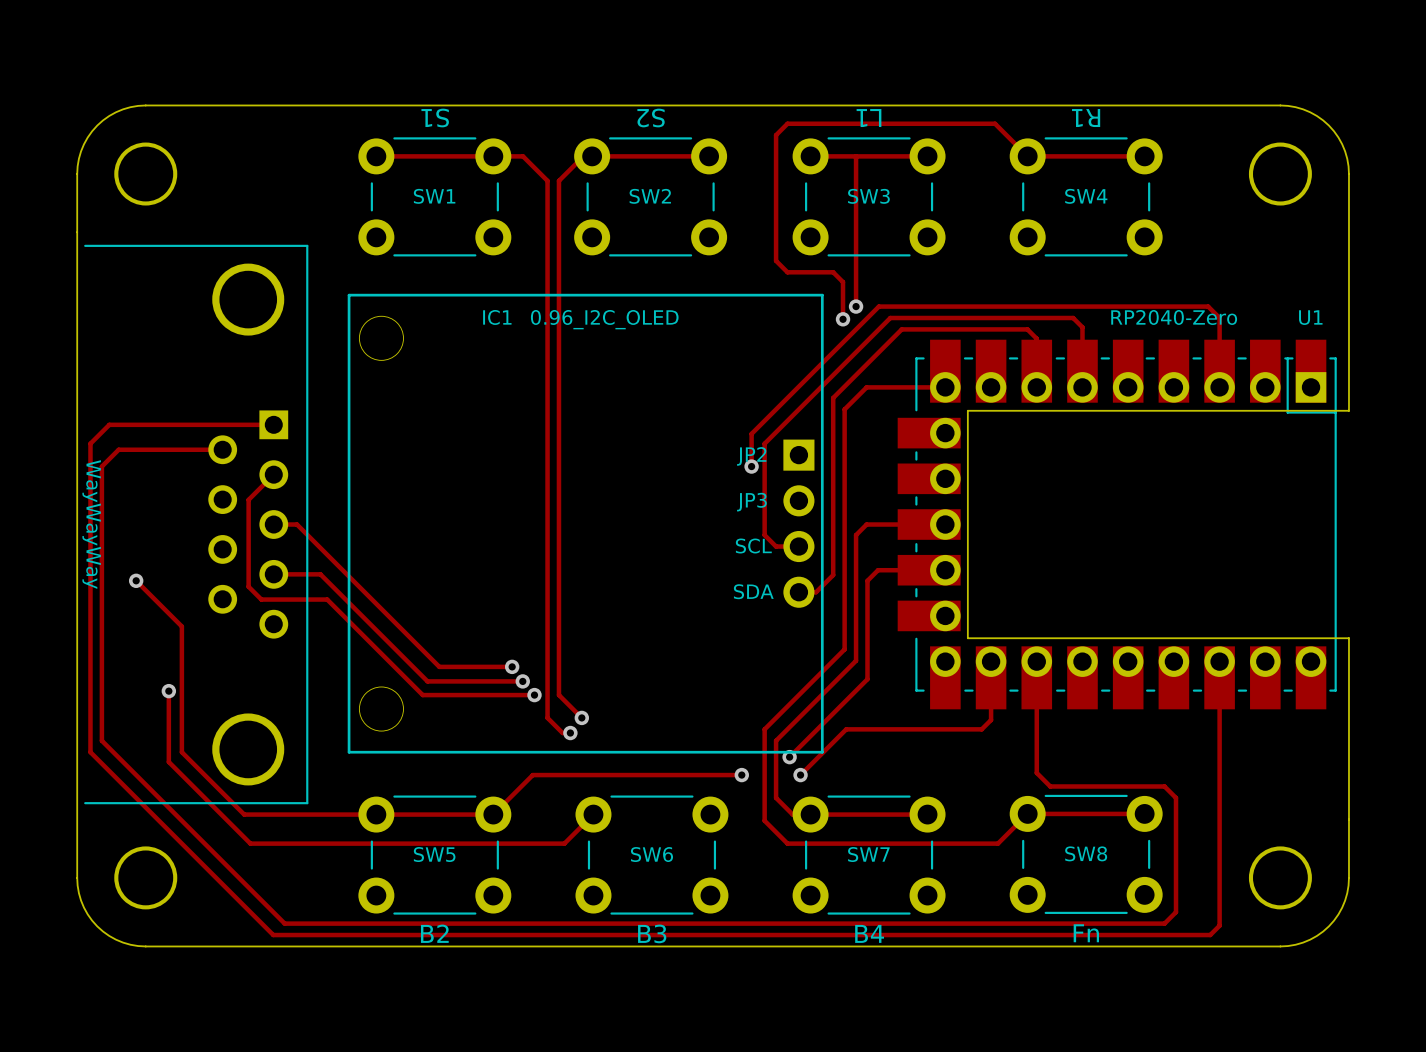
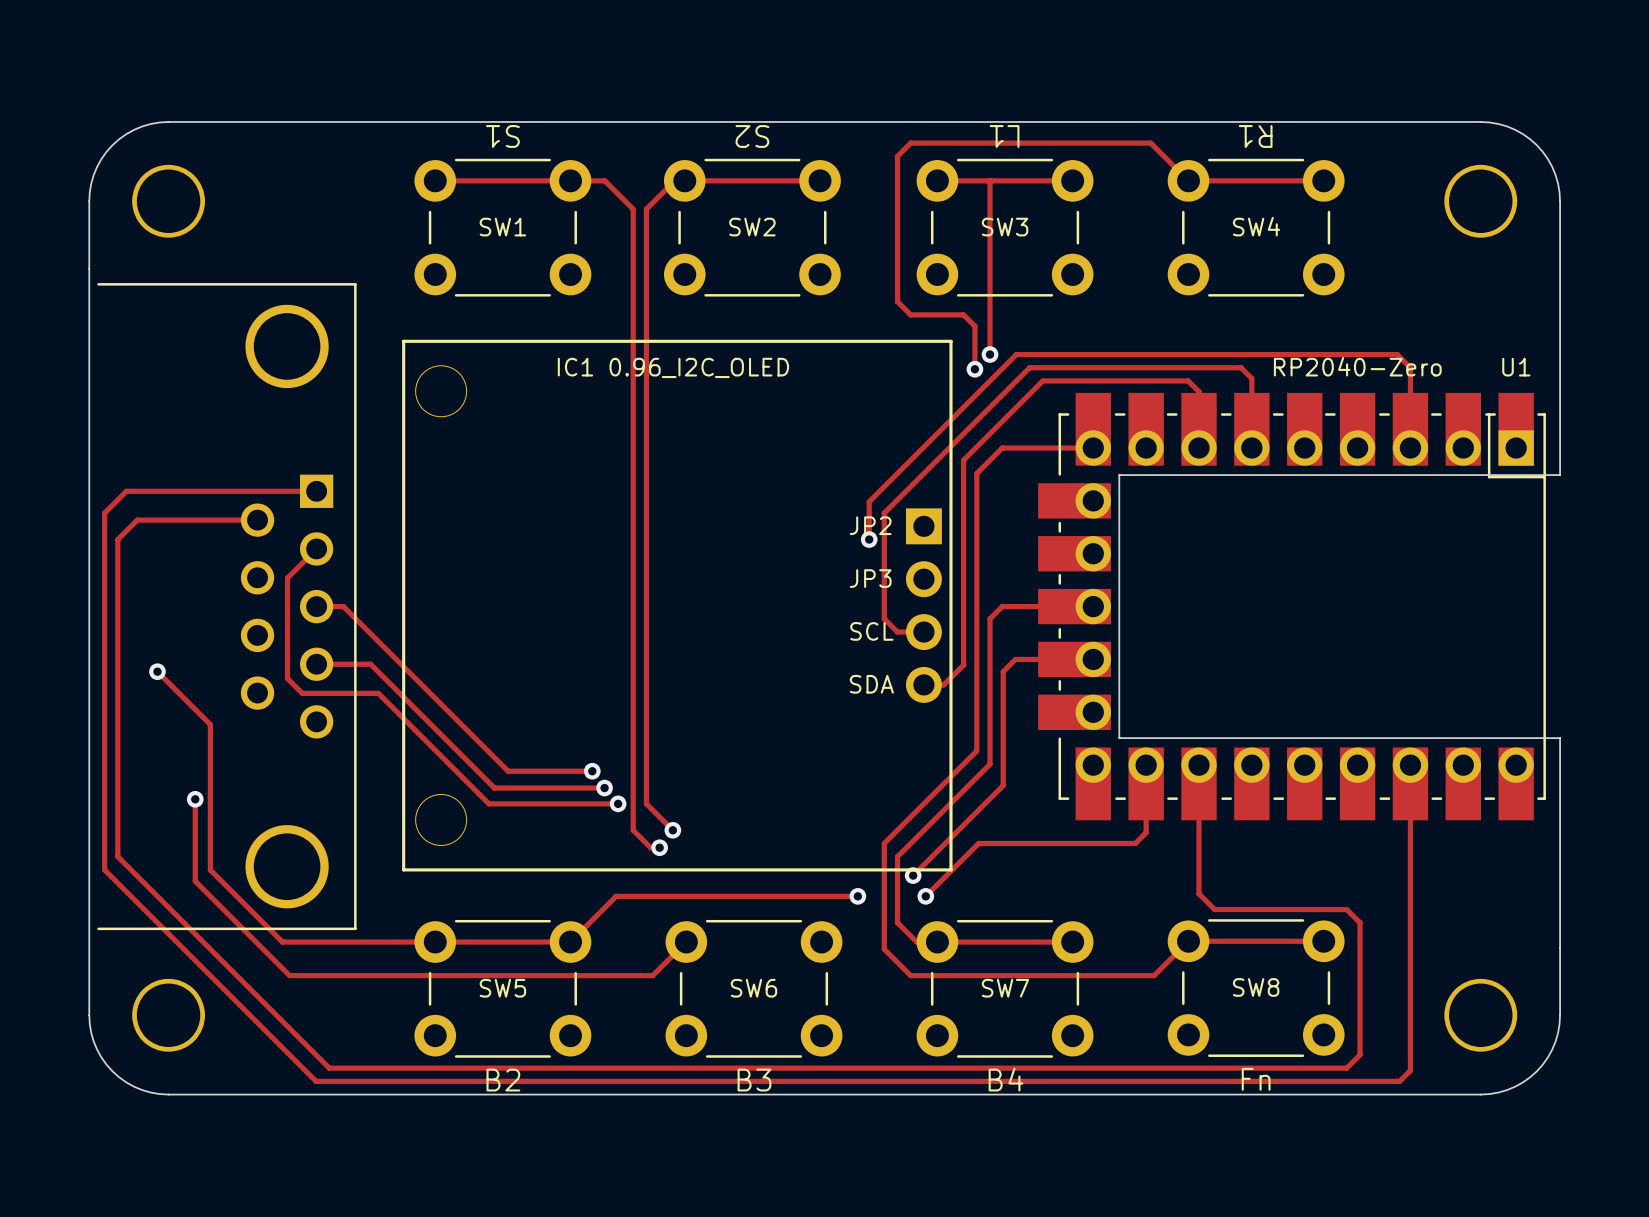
text: WayWayWay (91, 524) -> none

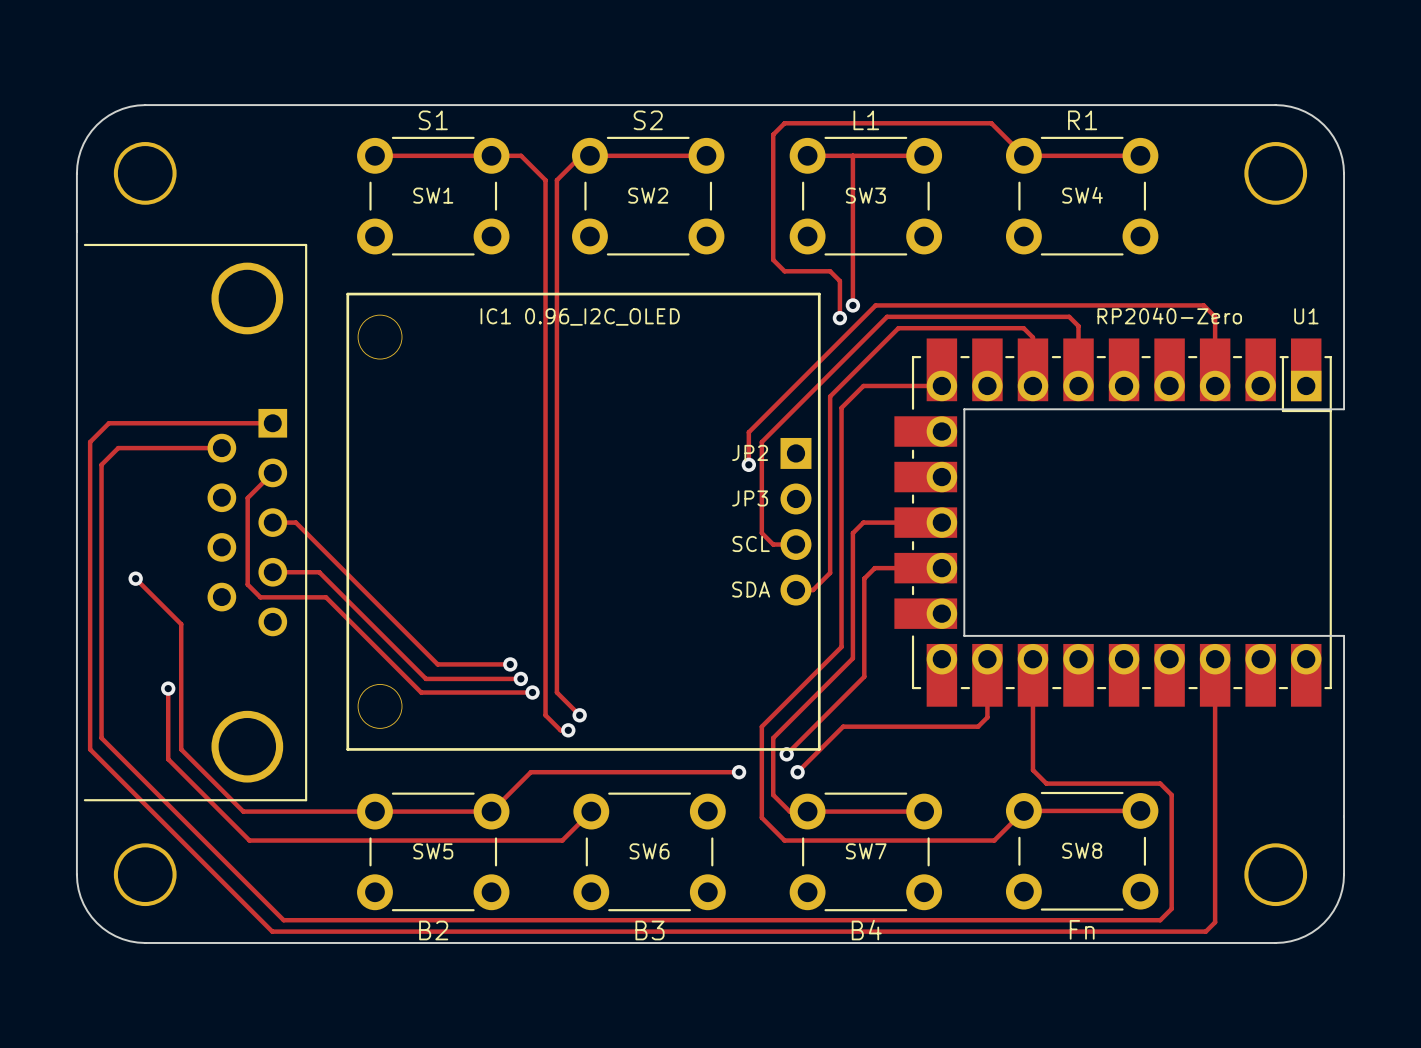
SW1 value rotation: 0° (502, 136) -> 180° (433, 120)
SW2 value rotation: 0° (752, 136) -> 180° (648, 120)
SW3 value rotation: 0° (1004, 136) -> 180° (866, 120)
SW4 value rotation: 0° (1255, 136) -> 180° (1082, 120)

